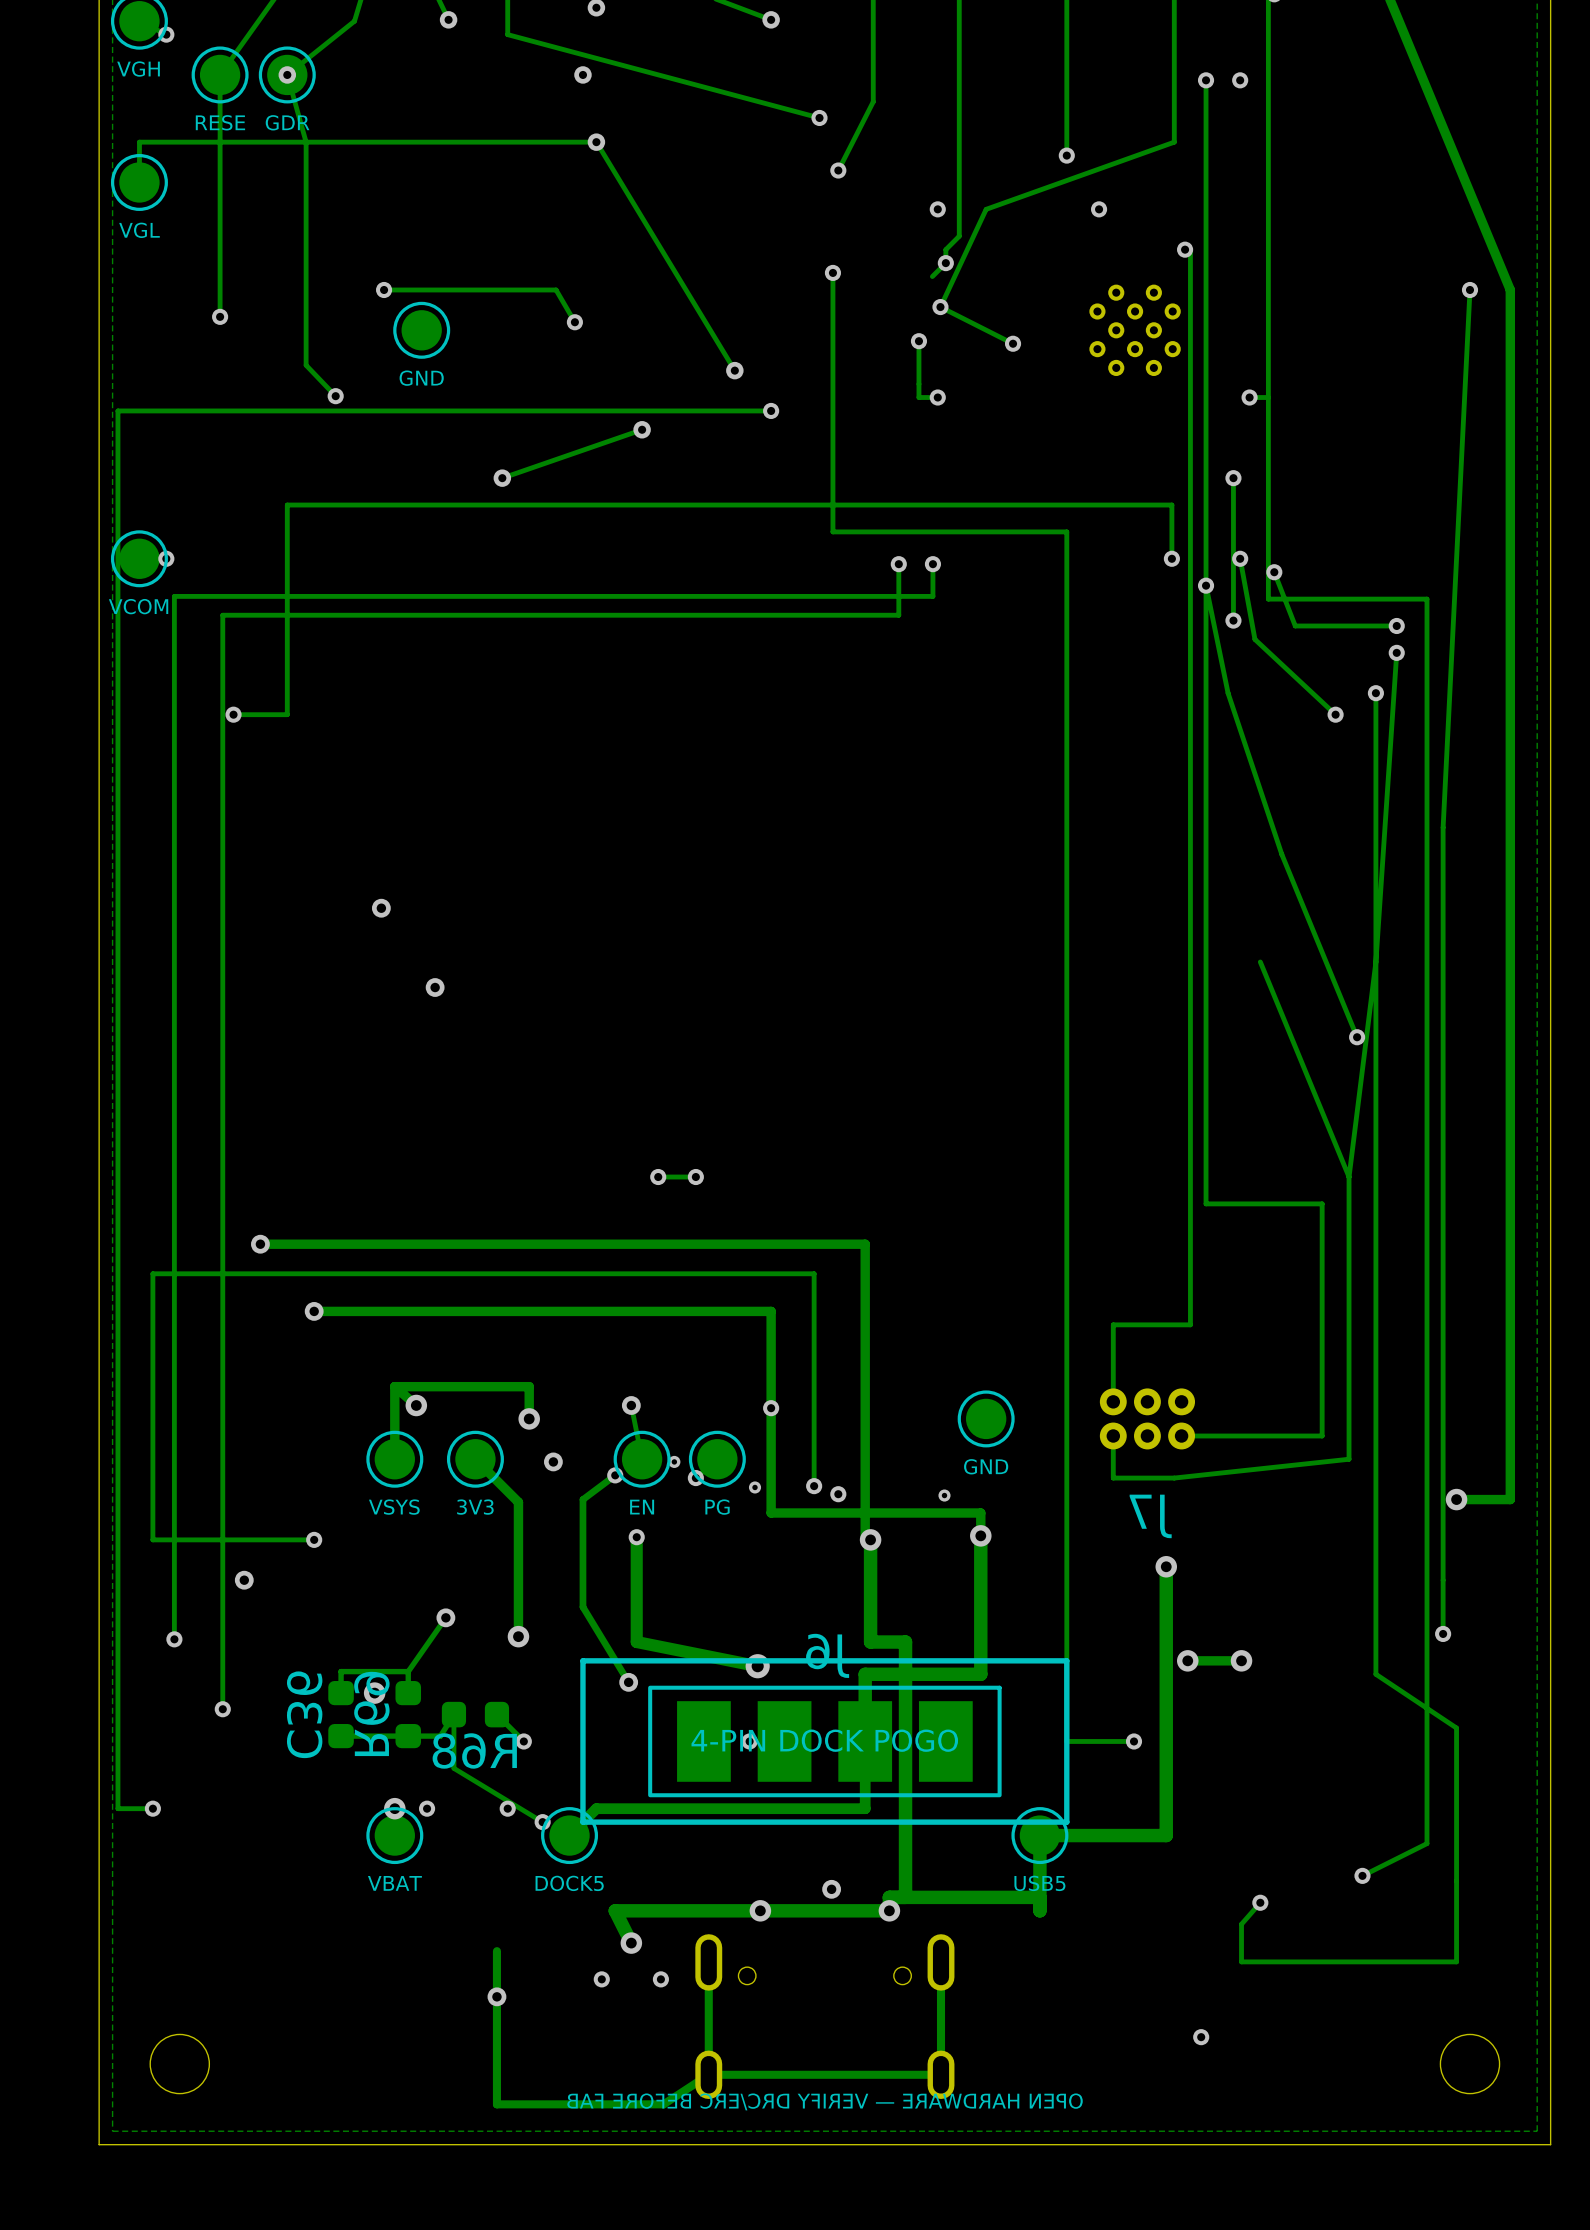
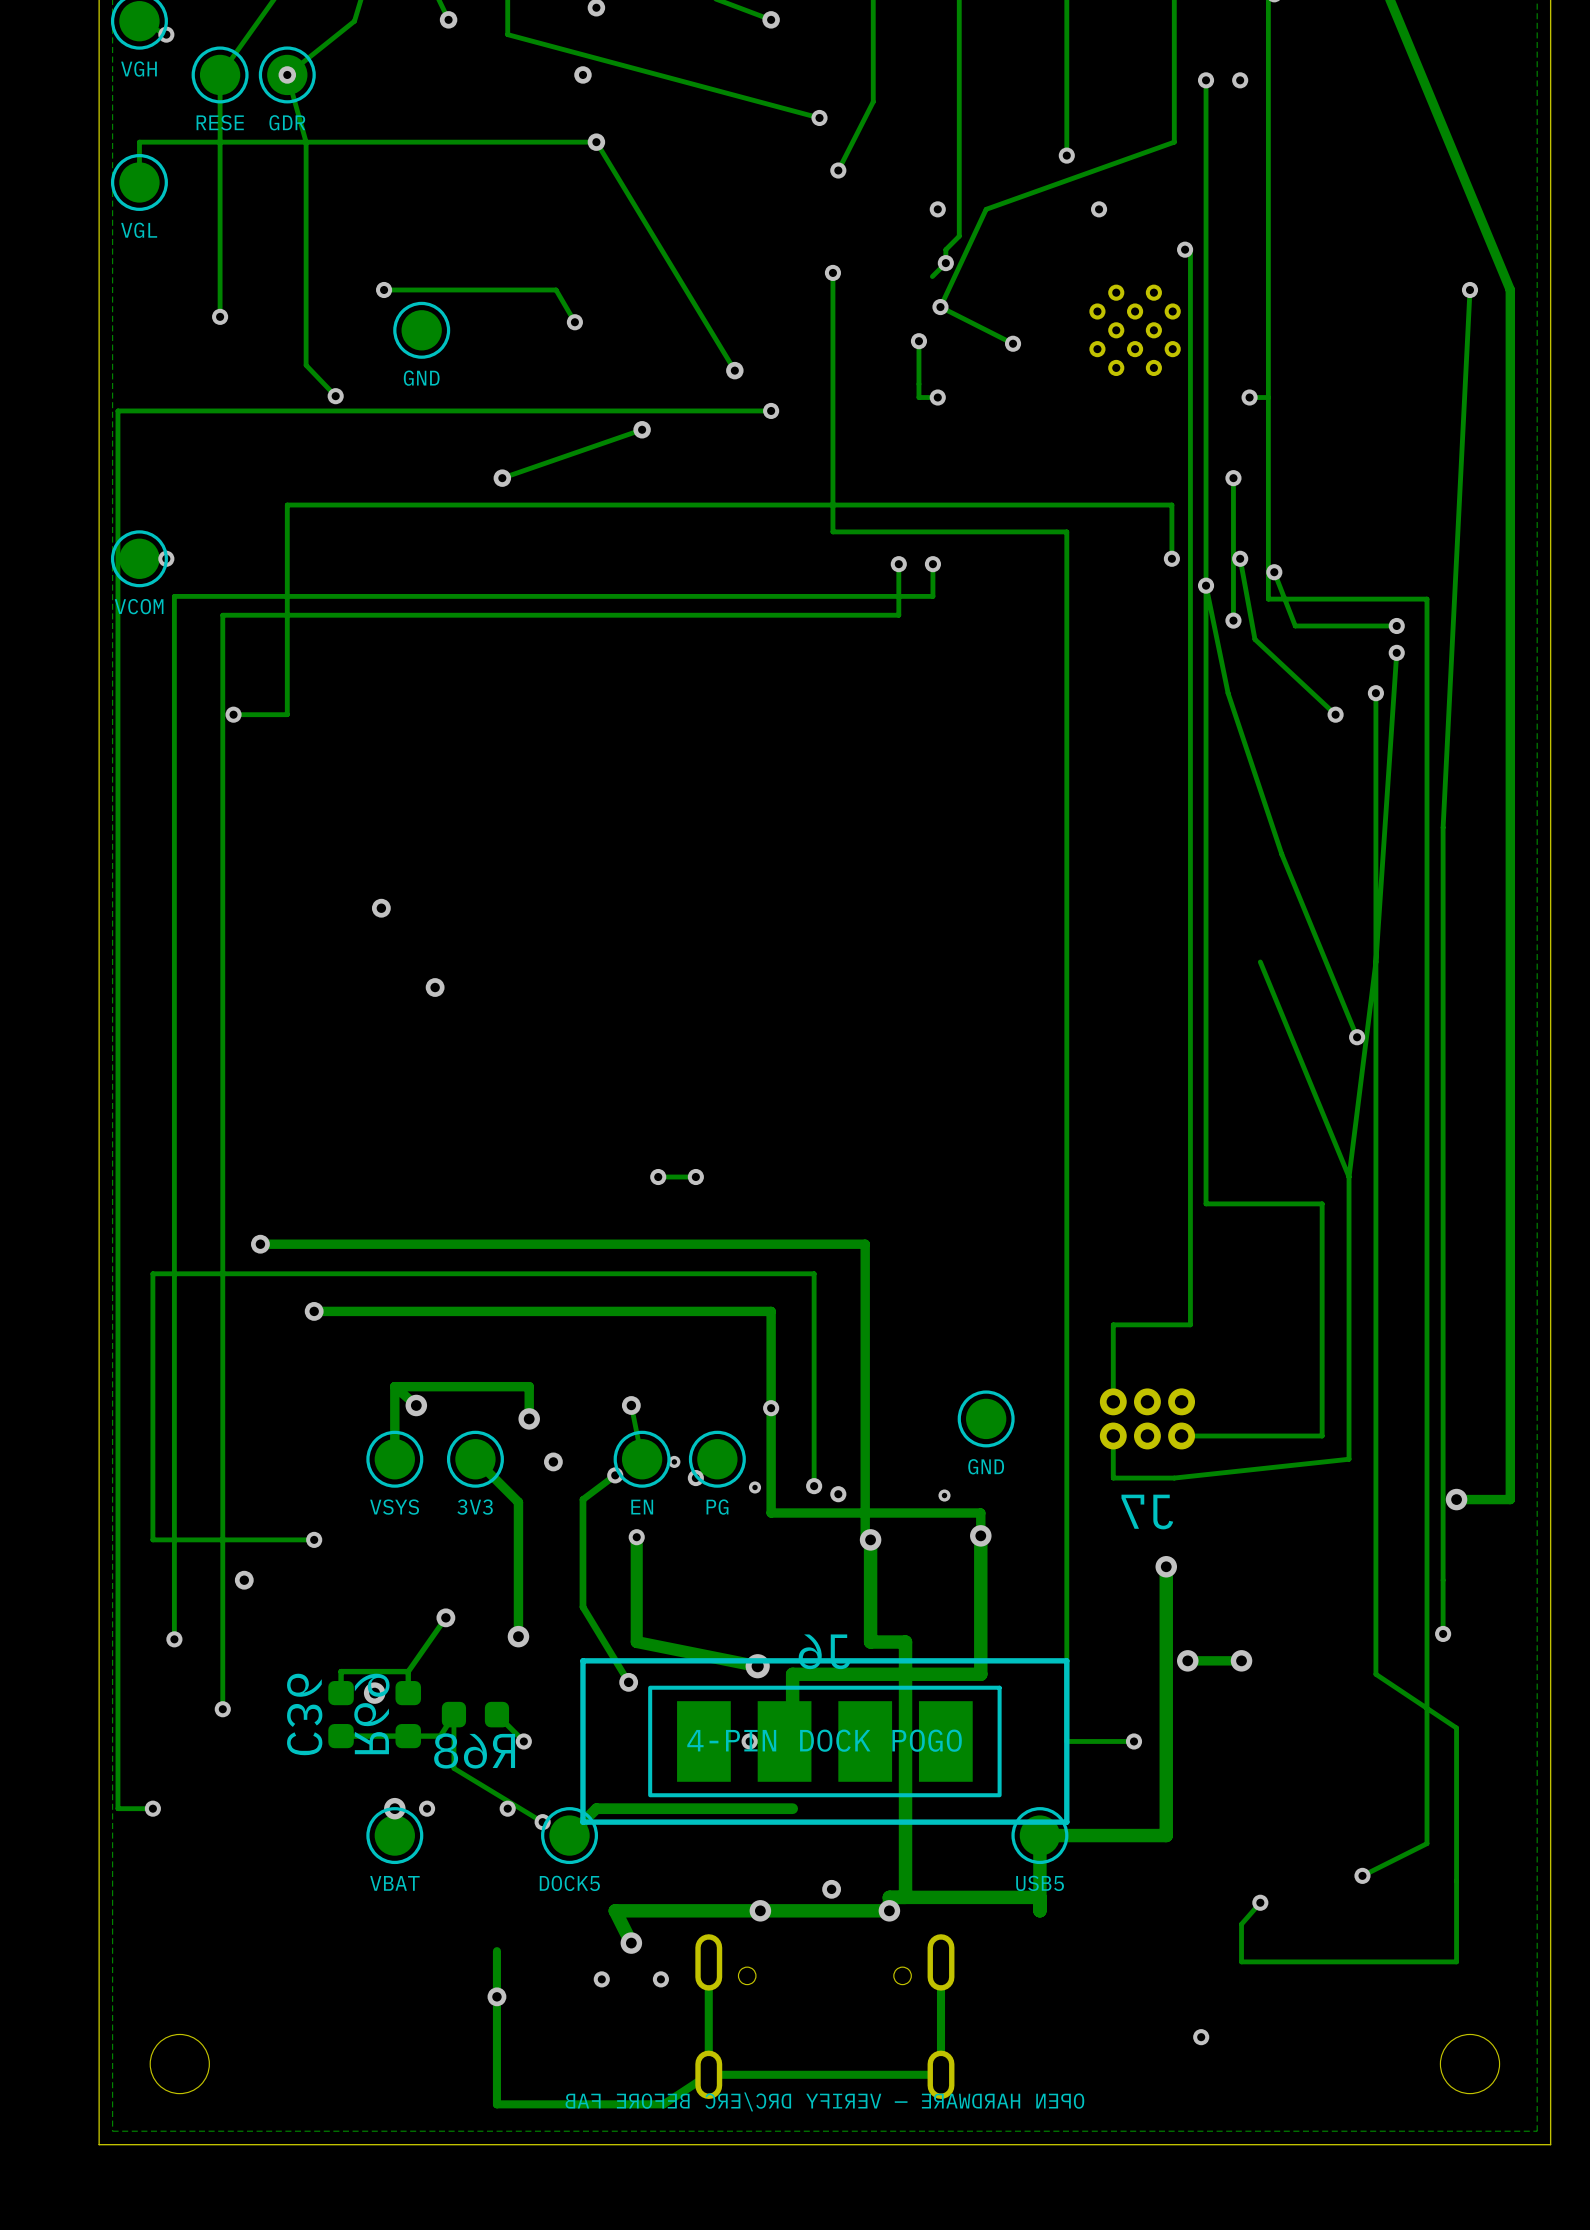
track: (865, 1674) (865, 1808) (792, 1808) -> (865, 1674) (792, 1674) (792, 1741)

